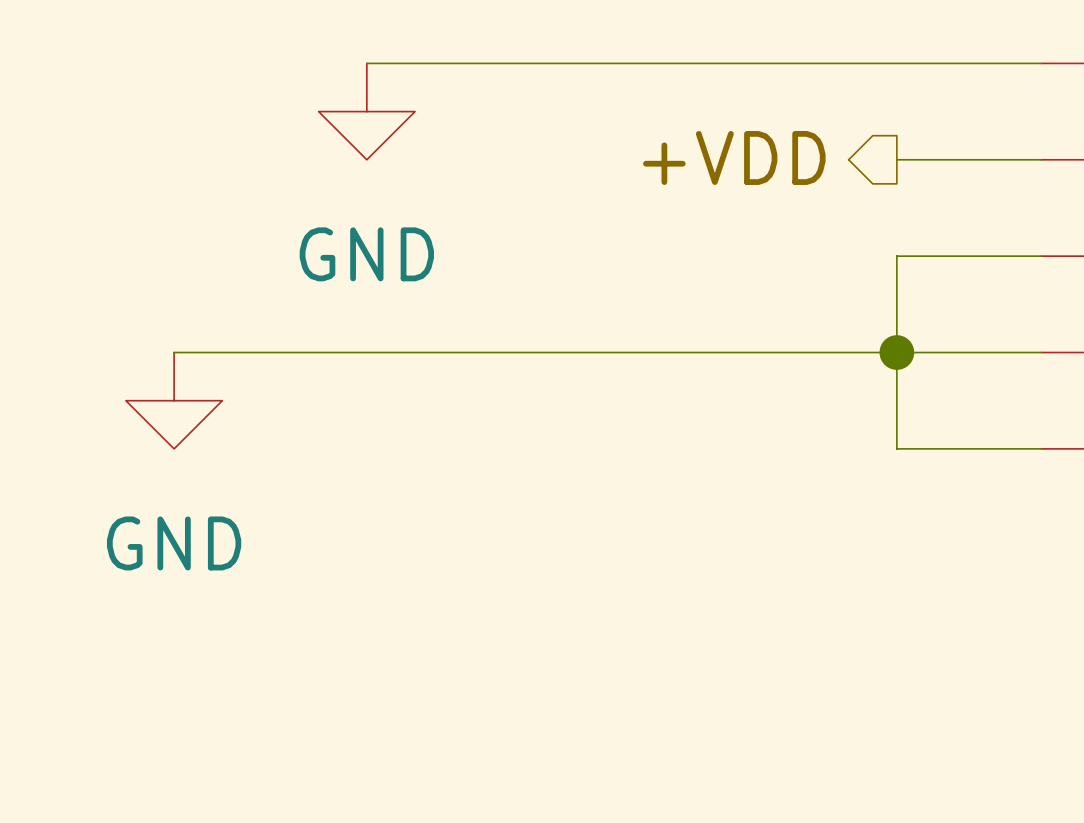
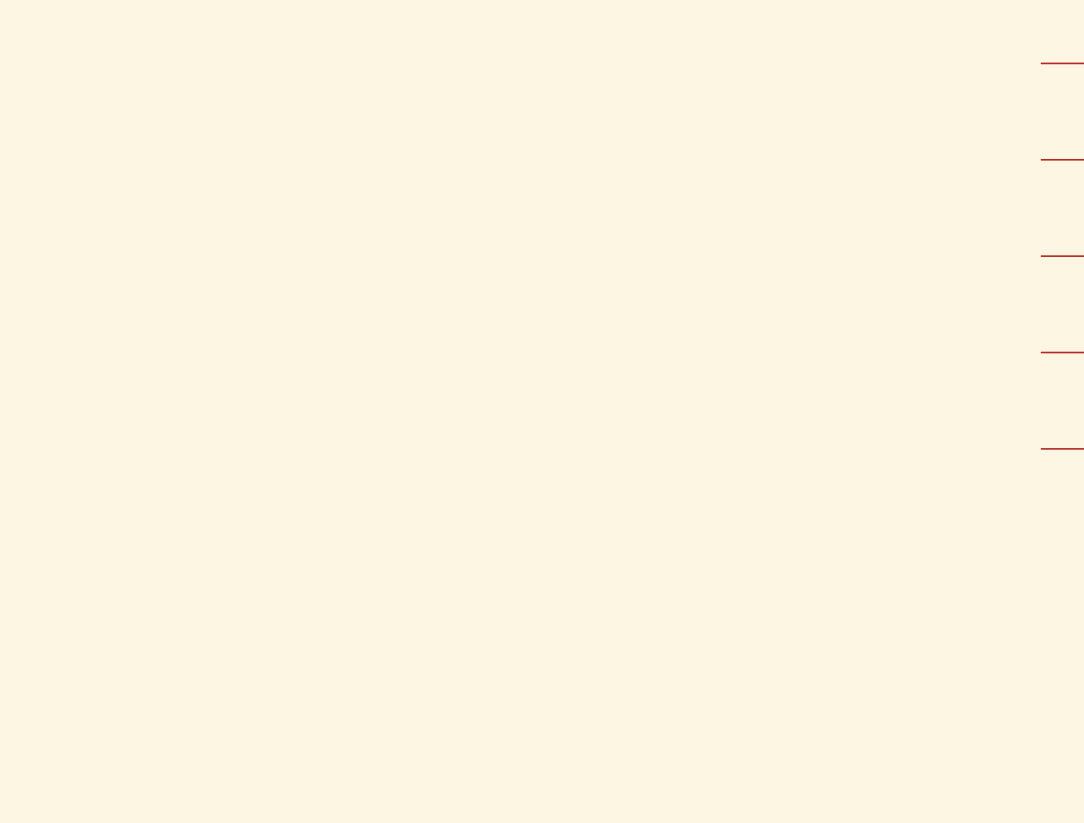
wire: (366, 63) (1041, 63) -> none
power symbol: GND (366, 111) -> none
hierarchical label: +VDD (734, 157) -> none
wire: (896, 159) (1041, 159) -> none
wire: (1041, 256) (896, 256) (896, 448) (1041, 448) -> none
wire: (174, 352) (1041, 352) -> none
junction: (896, 352) -> none
power symbol: GND (174, 400) -> none

